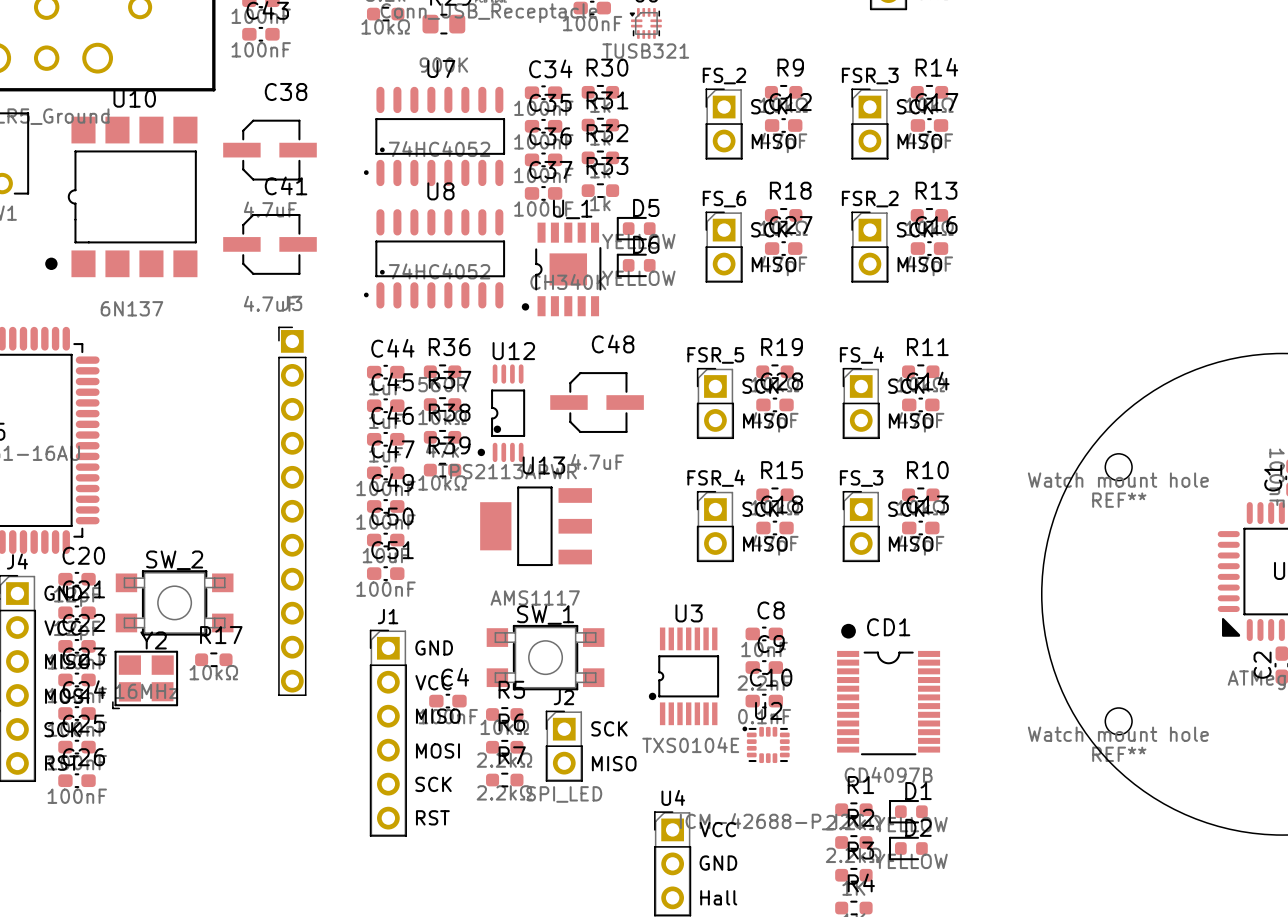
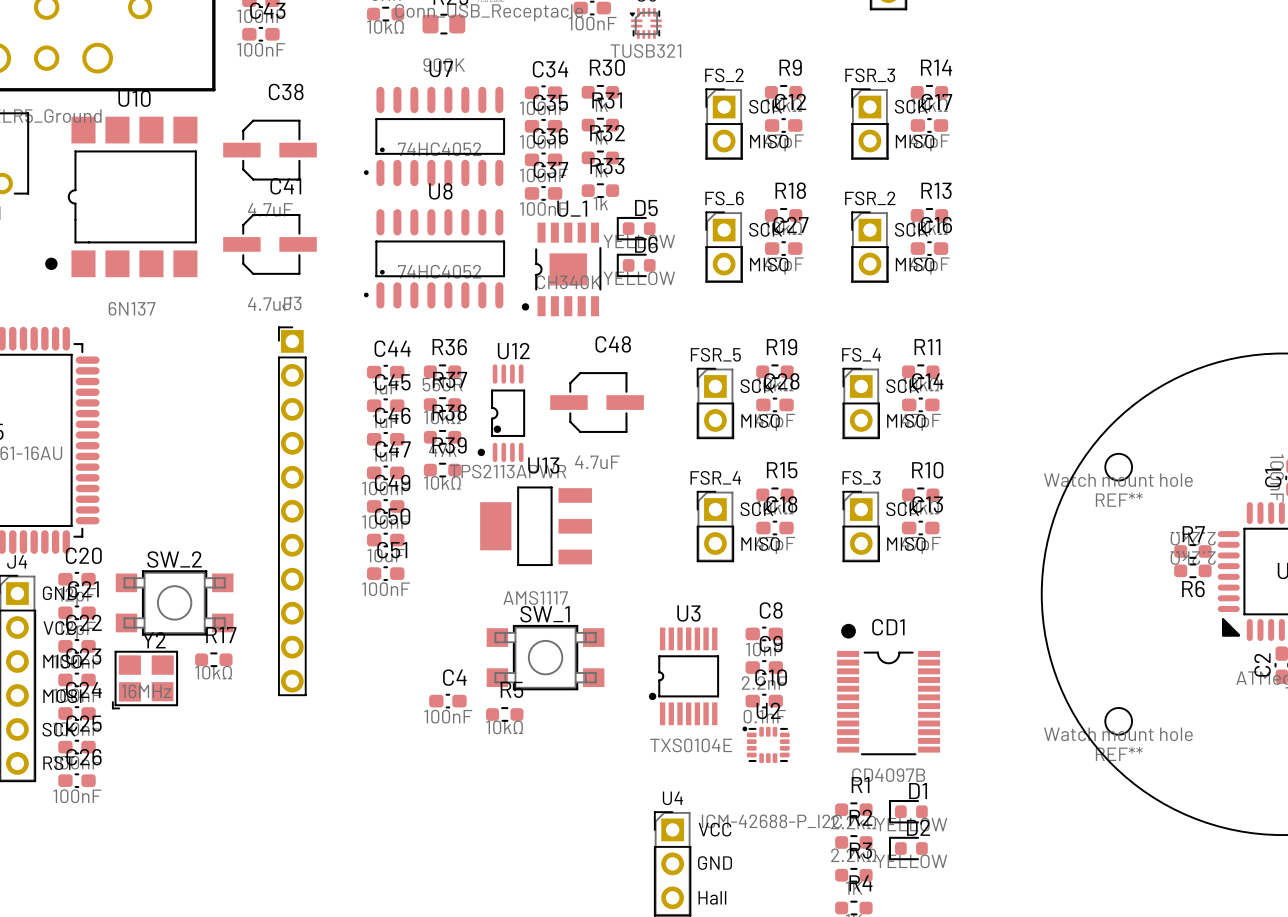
J1: (388, 733) -> none
J2: SPI_LED (564, 746) -> none
R6 rotation: 0° (504, 747) -> 180° (1192, 570)
R6 position: (504, 747) -> (1192, 570)
R7 rotation: 0° (504, 780) -> 180° (1192, 551)
R7 position: (504, 780) -> (1192, 551)

